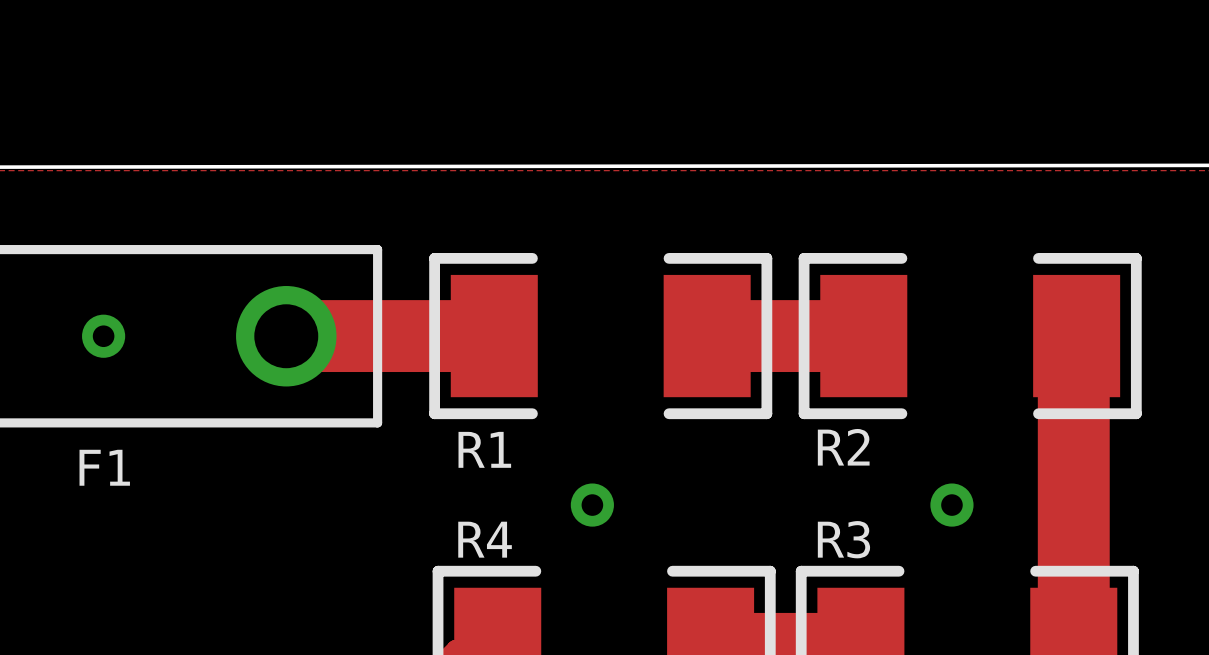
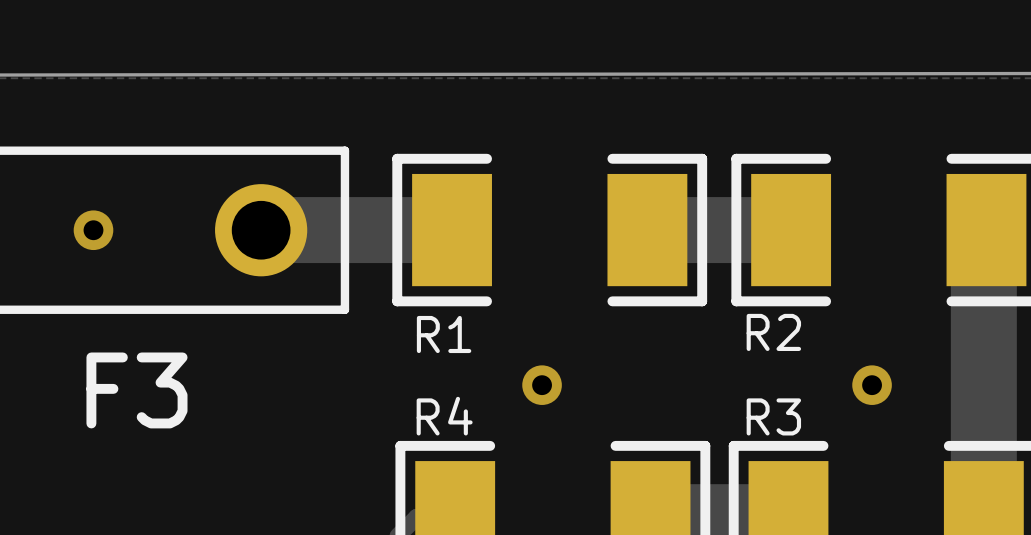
F1 name: F1 (104, 467) -> F3 (136, 390)

